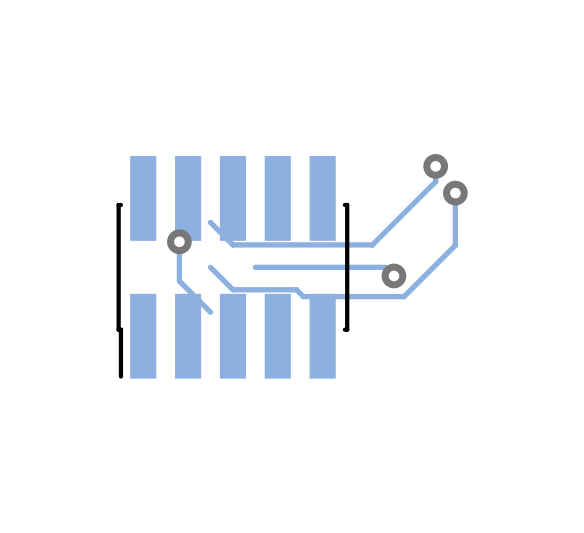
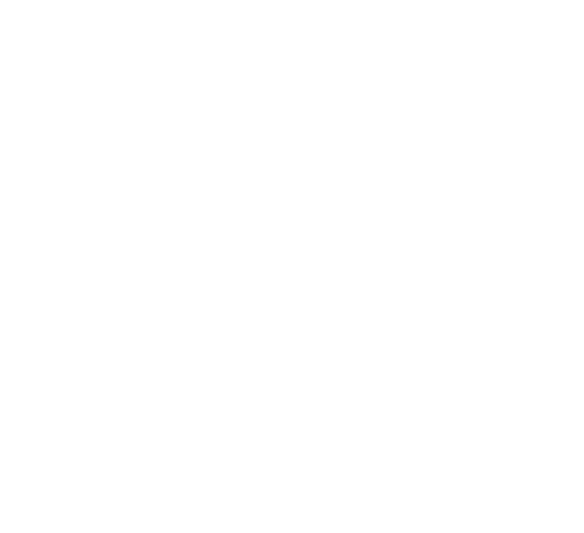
track: (435, 166) (435, 181) (372, 244) (232, 244) (210, 222) -> none
via: (435, 166) -> none
track: (455, 193) (455, 245) (404, 296) (303, 296) (296, 289) (232, 289) (210, 267) -> none
via: (455, 193) -> none
track: (179, 241) (179, 281) (210, 312) -> none
via: (179, 241) -> none
part: (232, 267) -> none
track: (255, 267) (385, 267) (393, 275) -> none
via: (393, 275) -> none

